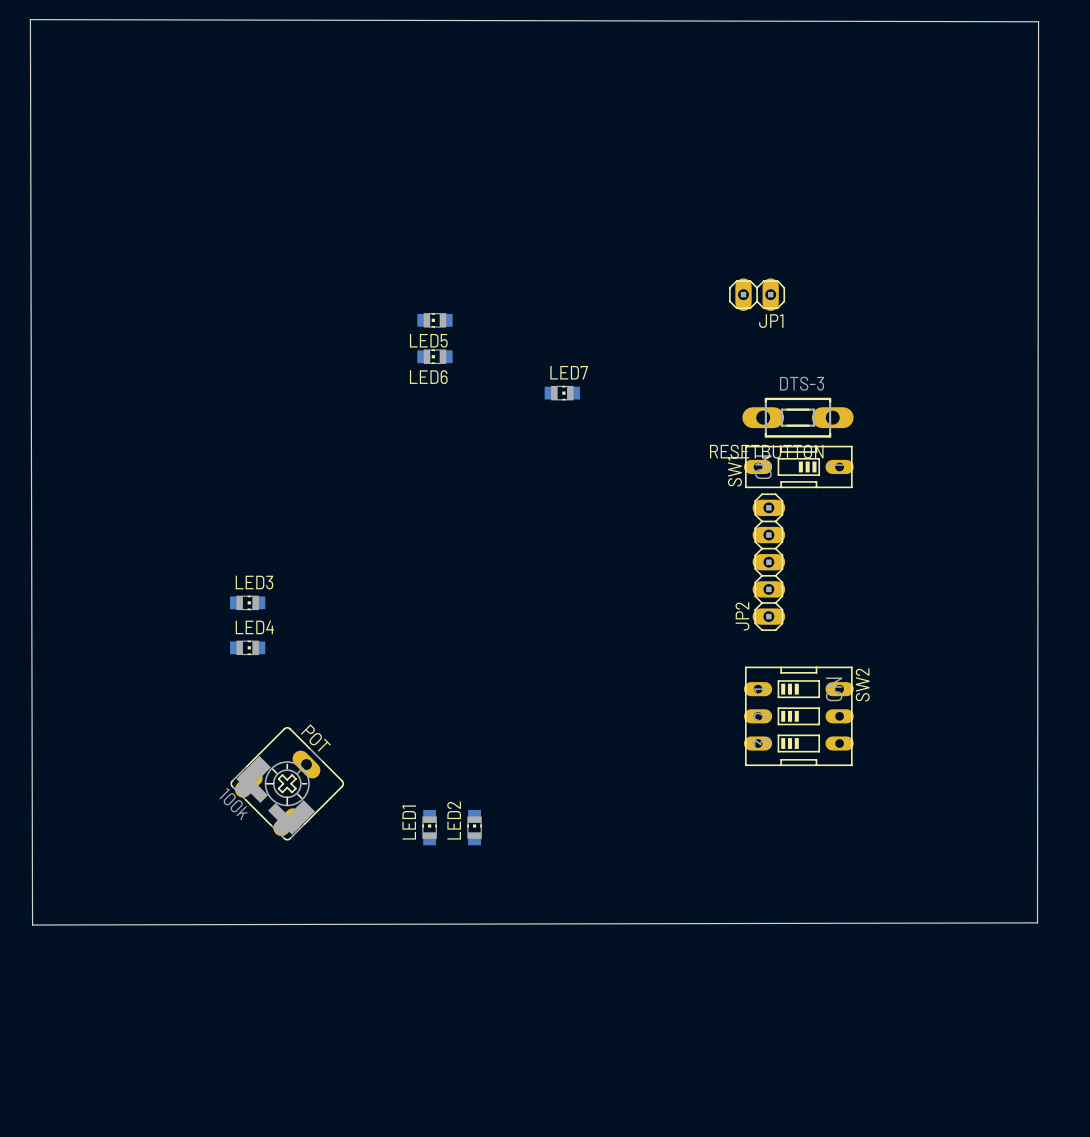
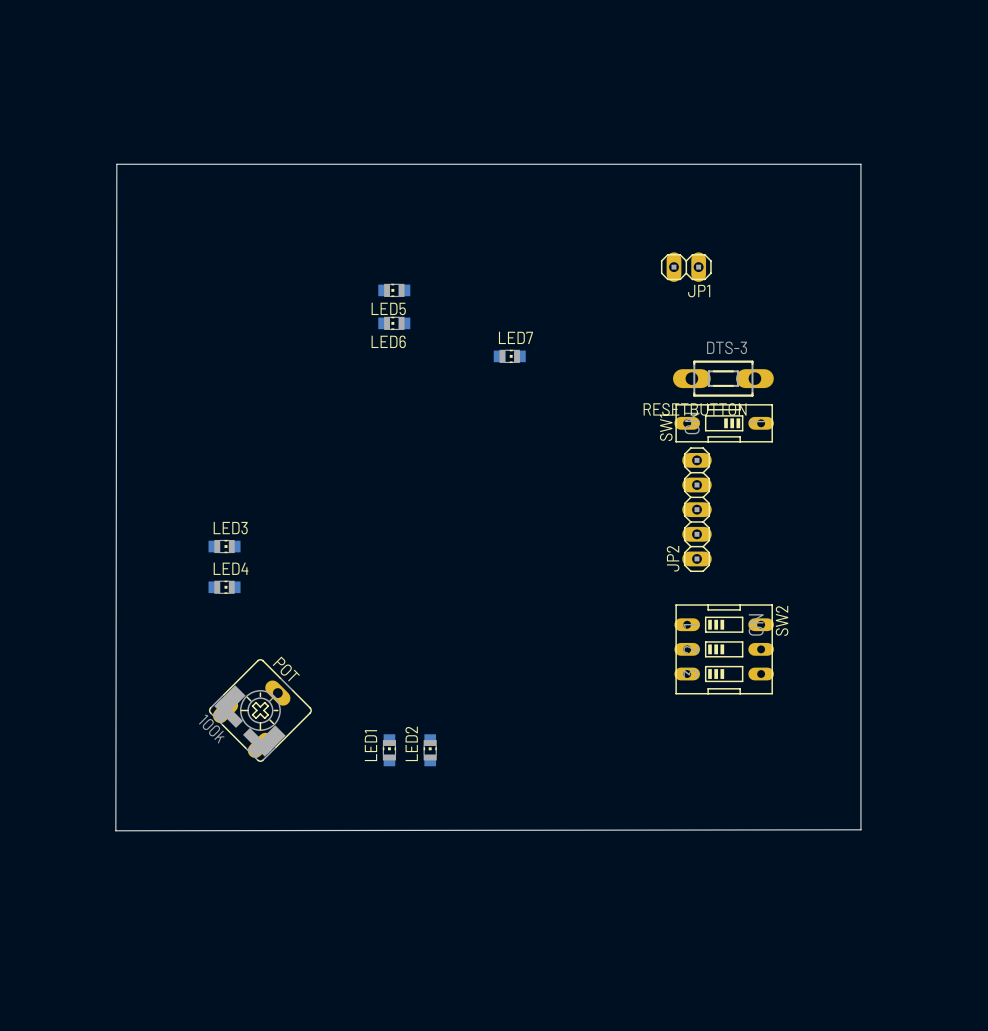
board edge: (30, 19) (32, 925) (1037, 922) (1038, 21) (30, 19) -> (860, 164) (860, 829) (115, 830) (116, 164) (860, 164)

